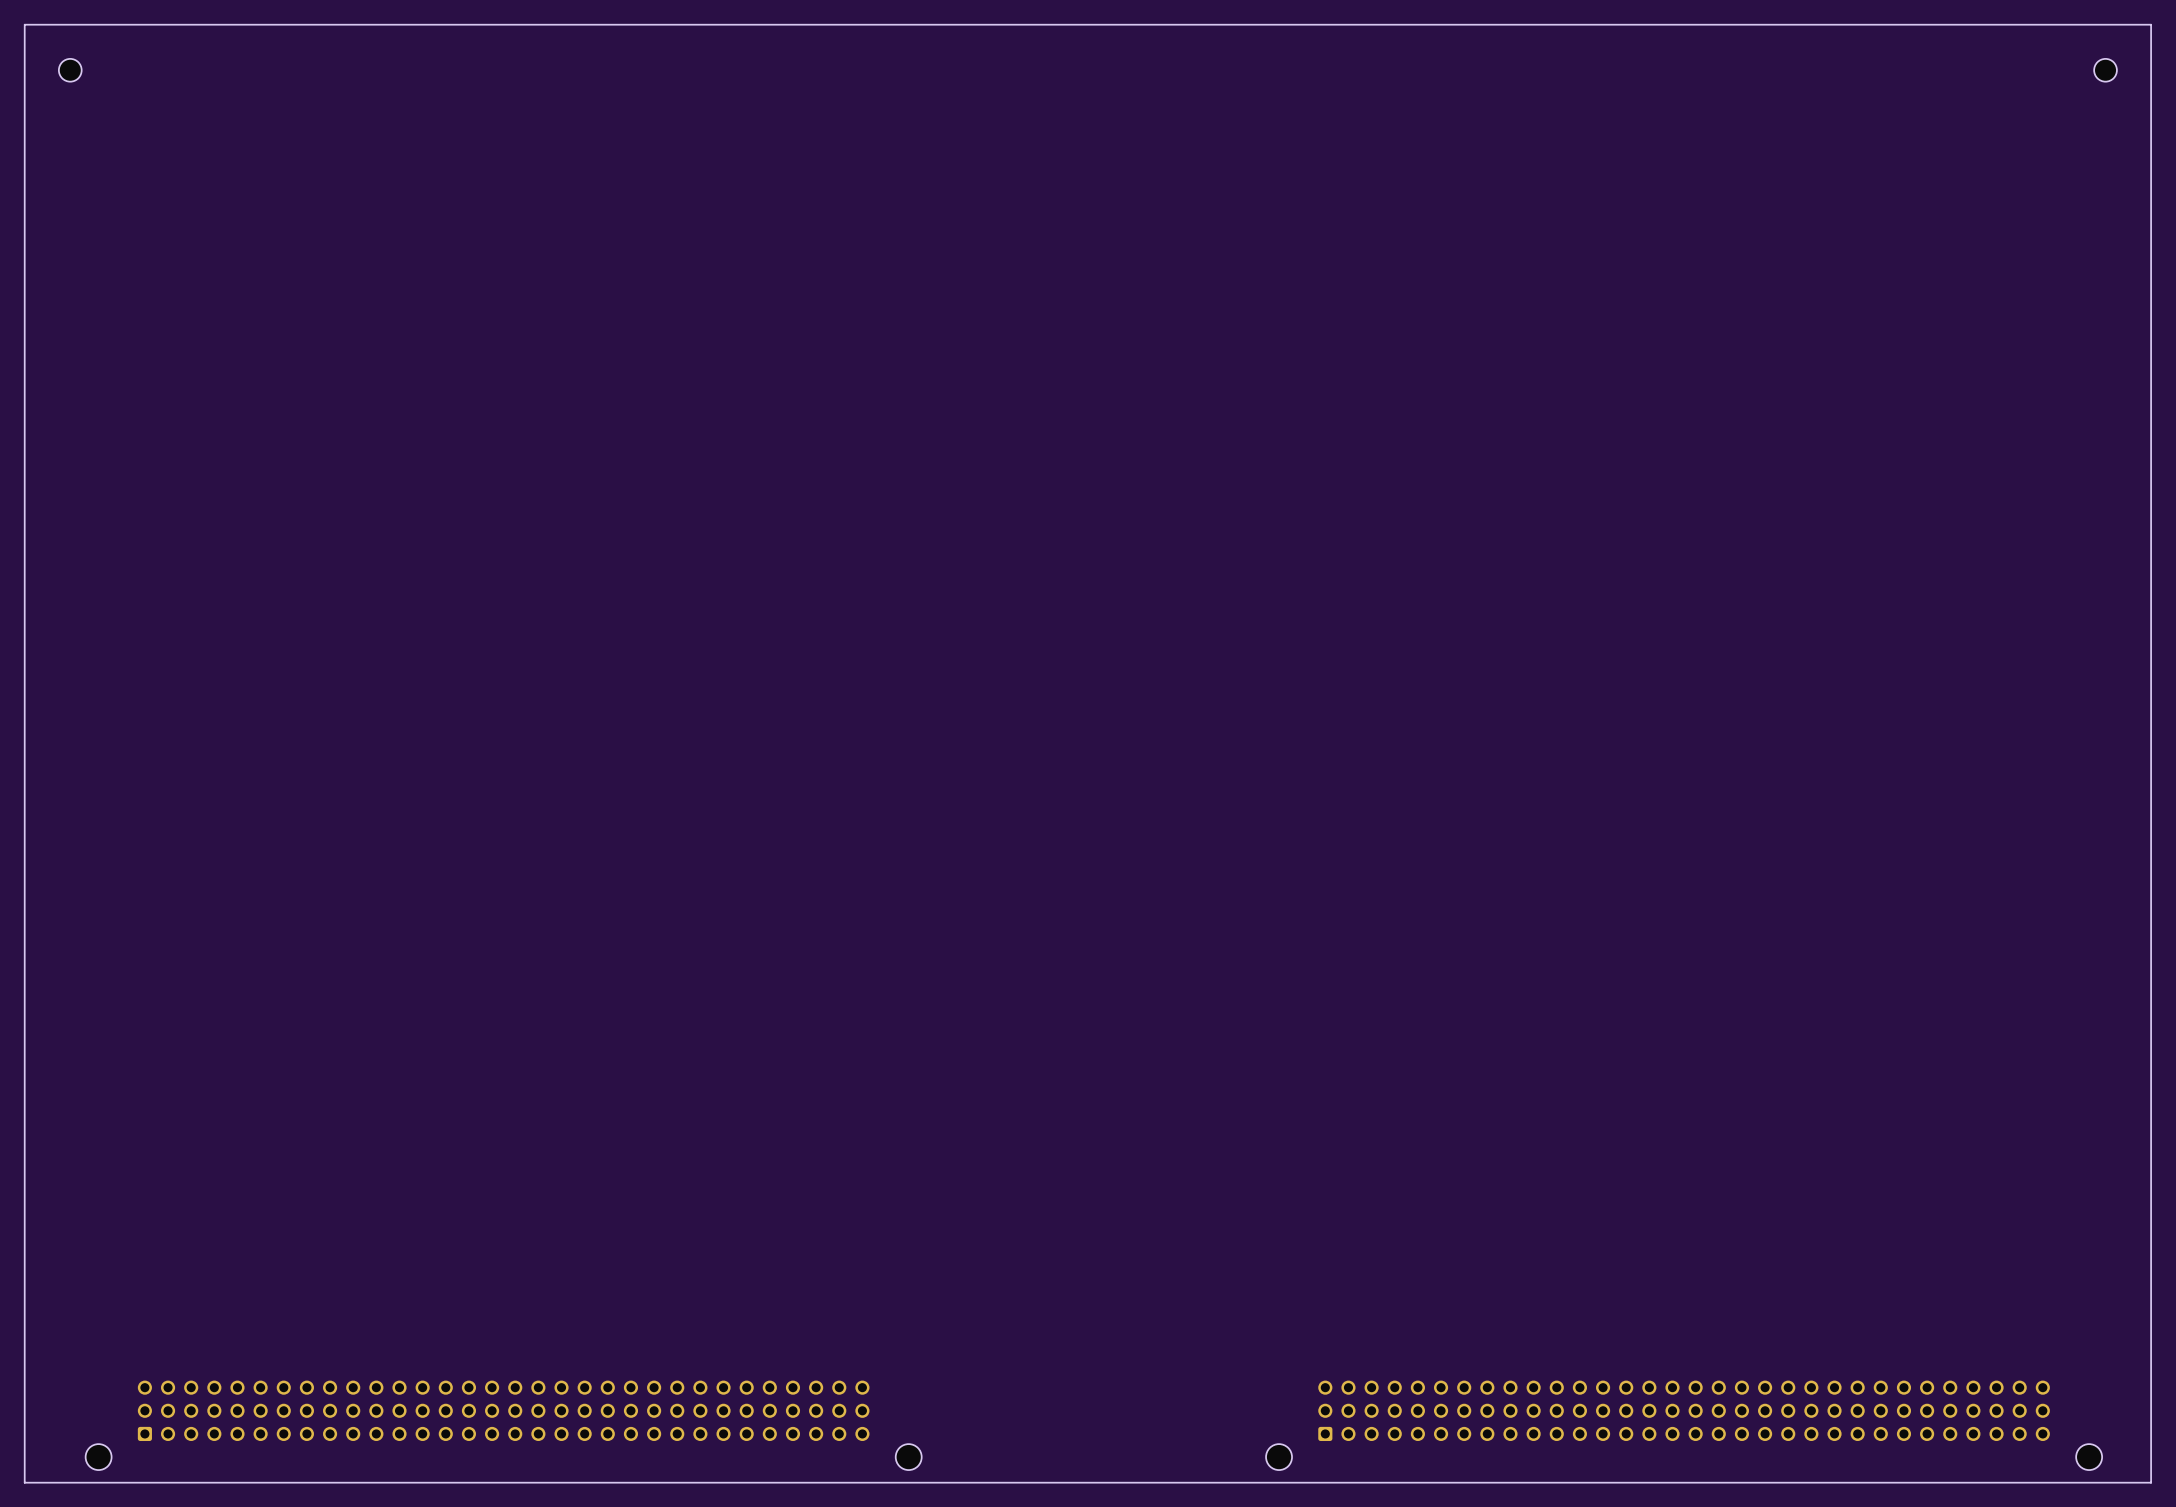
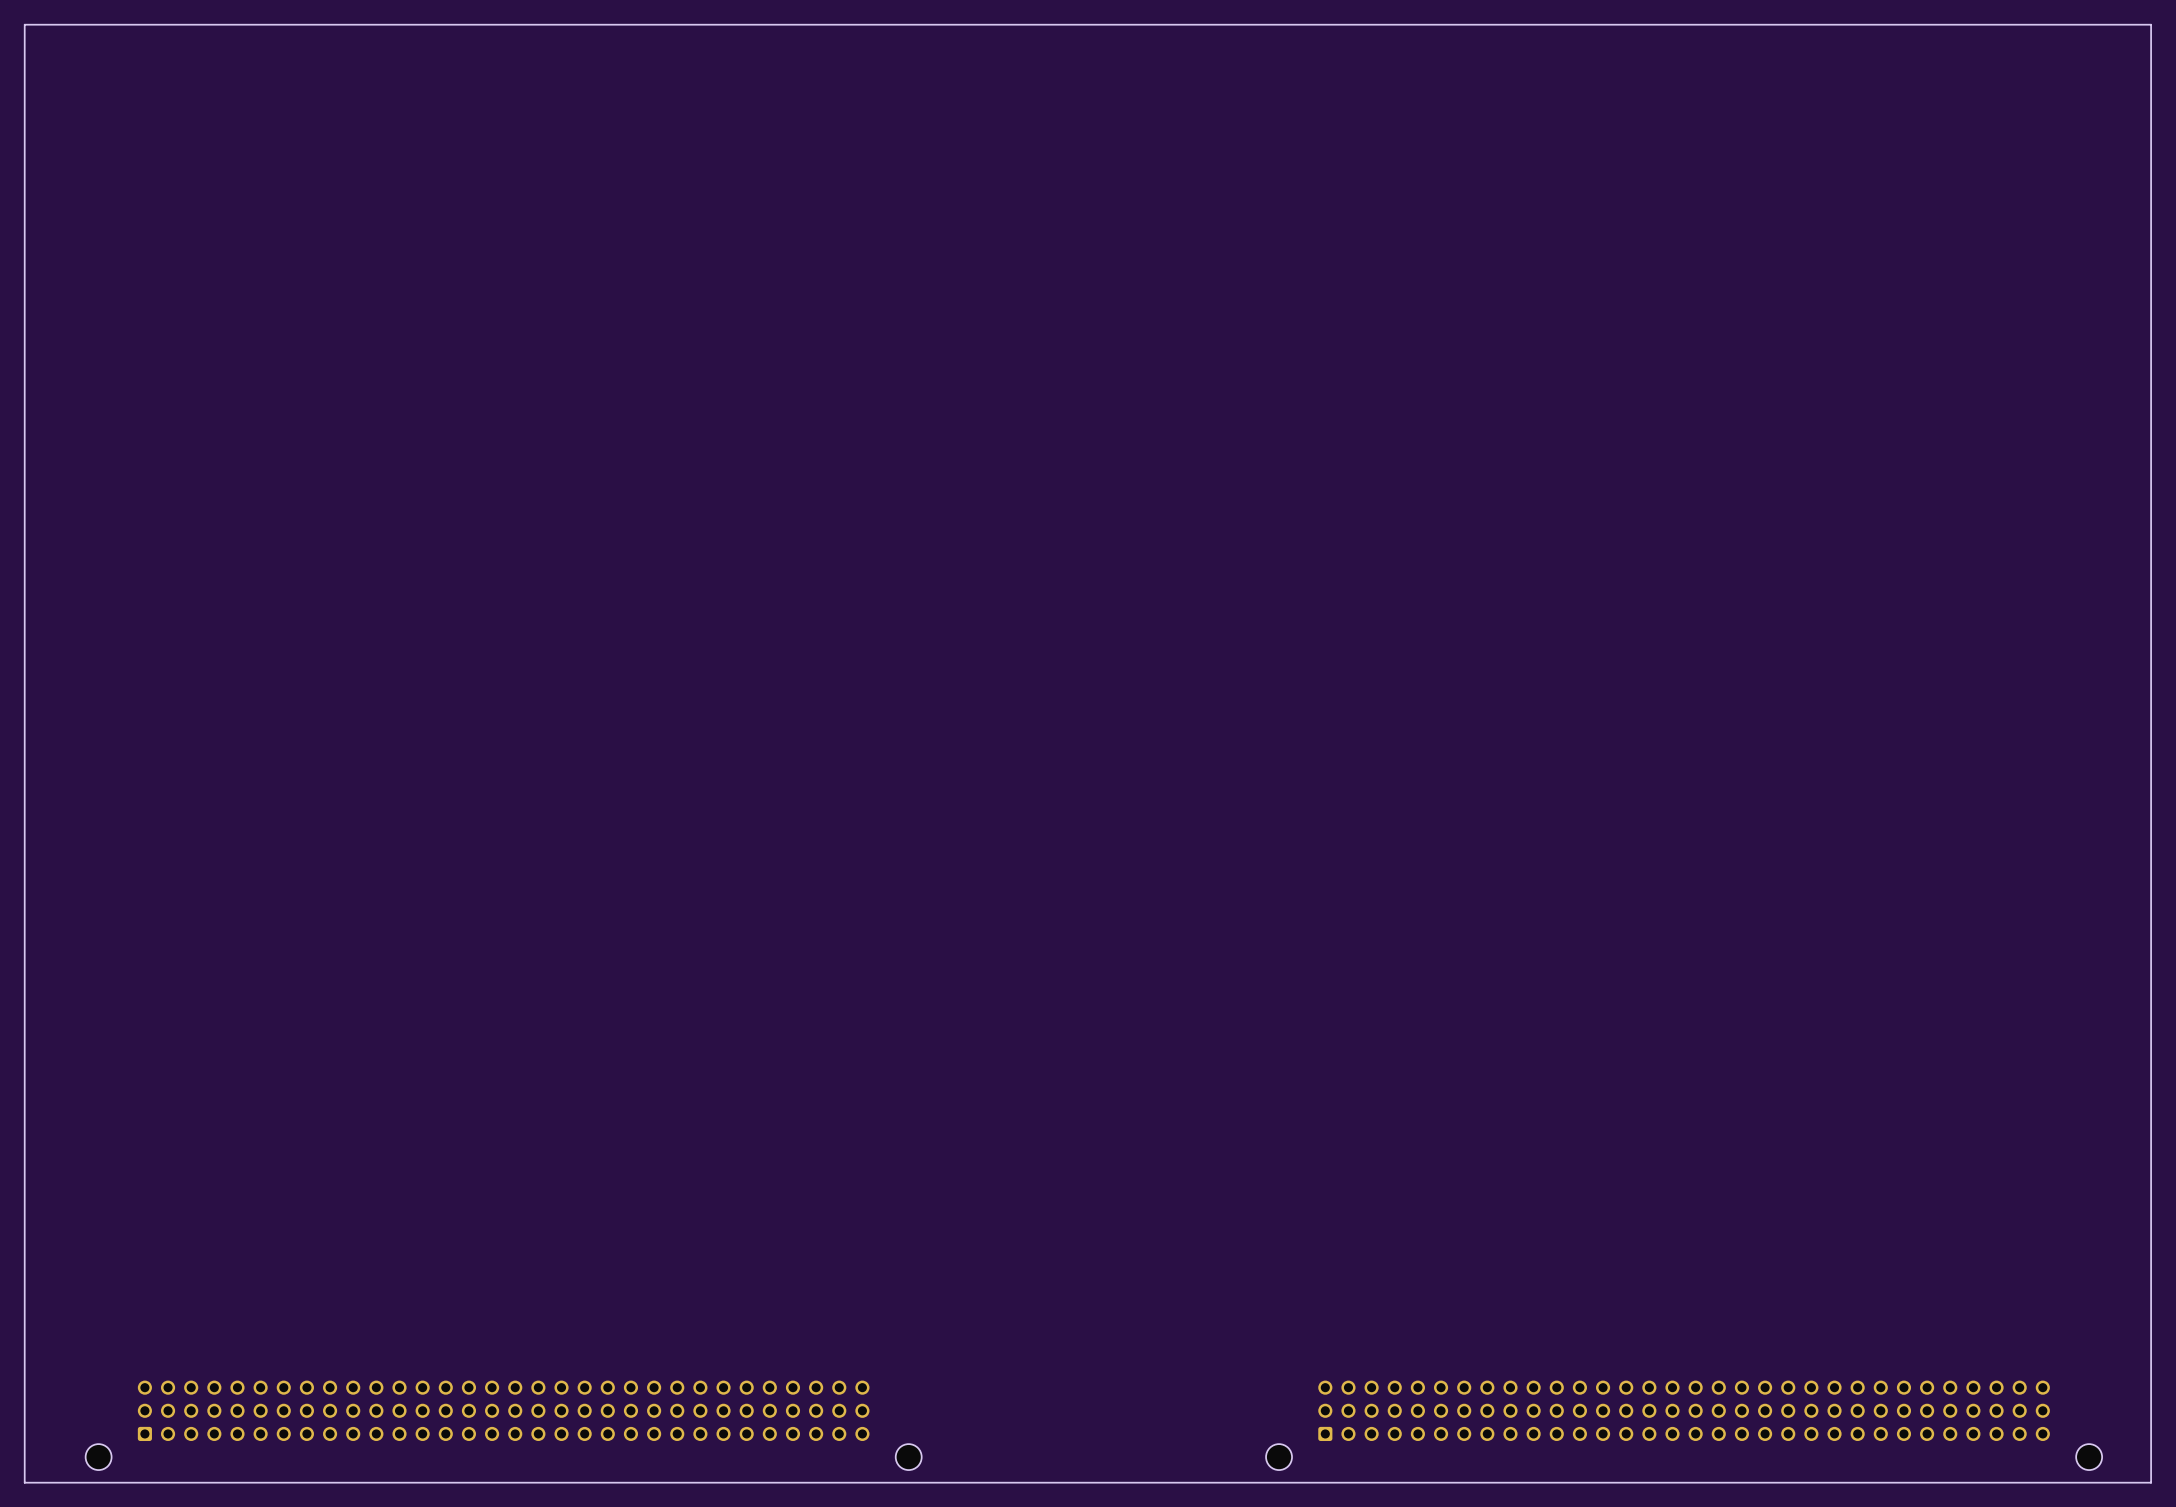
part: (70, 70) -> none
part: (2105, 70) -> none

